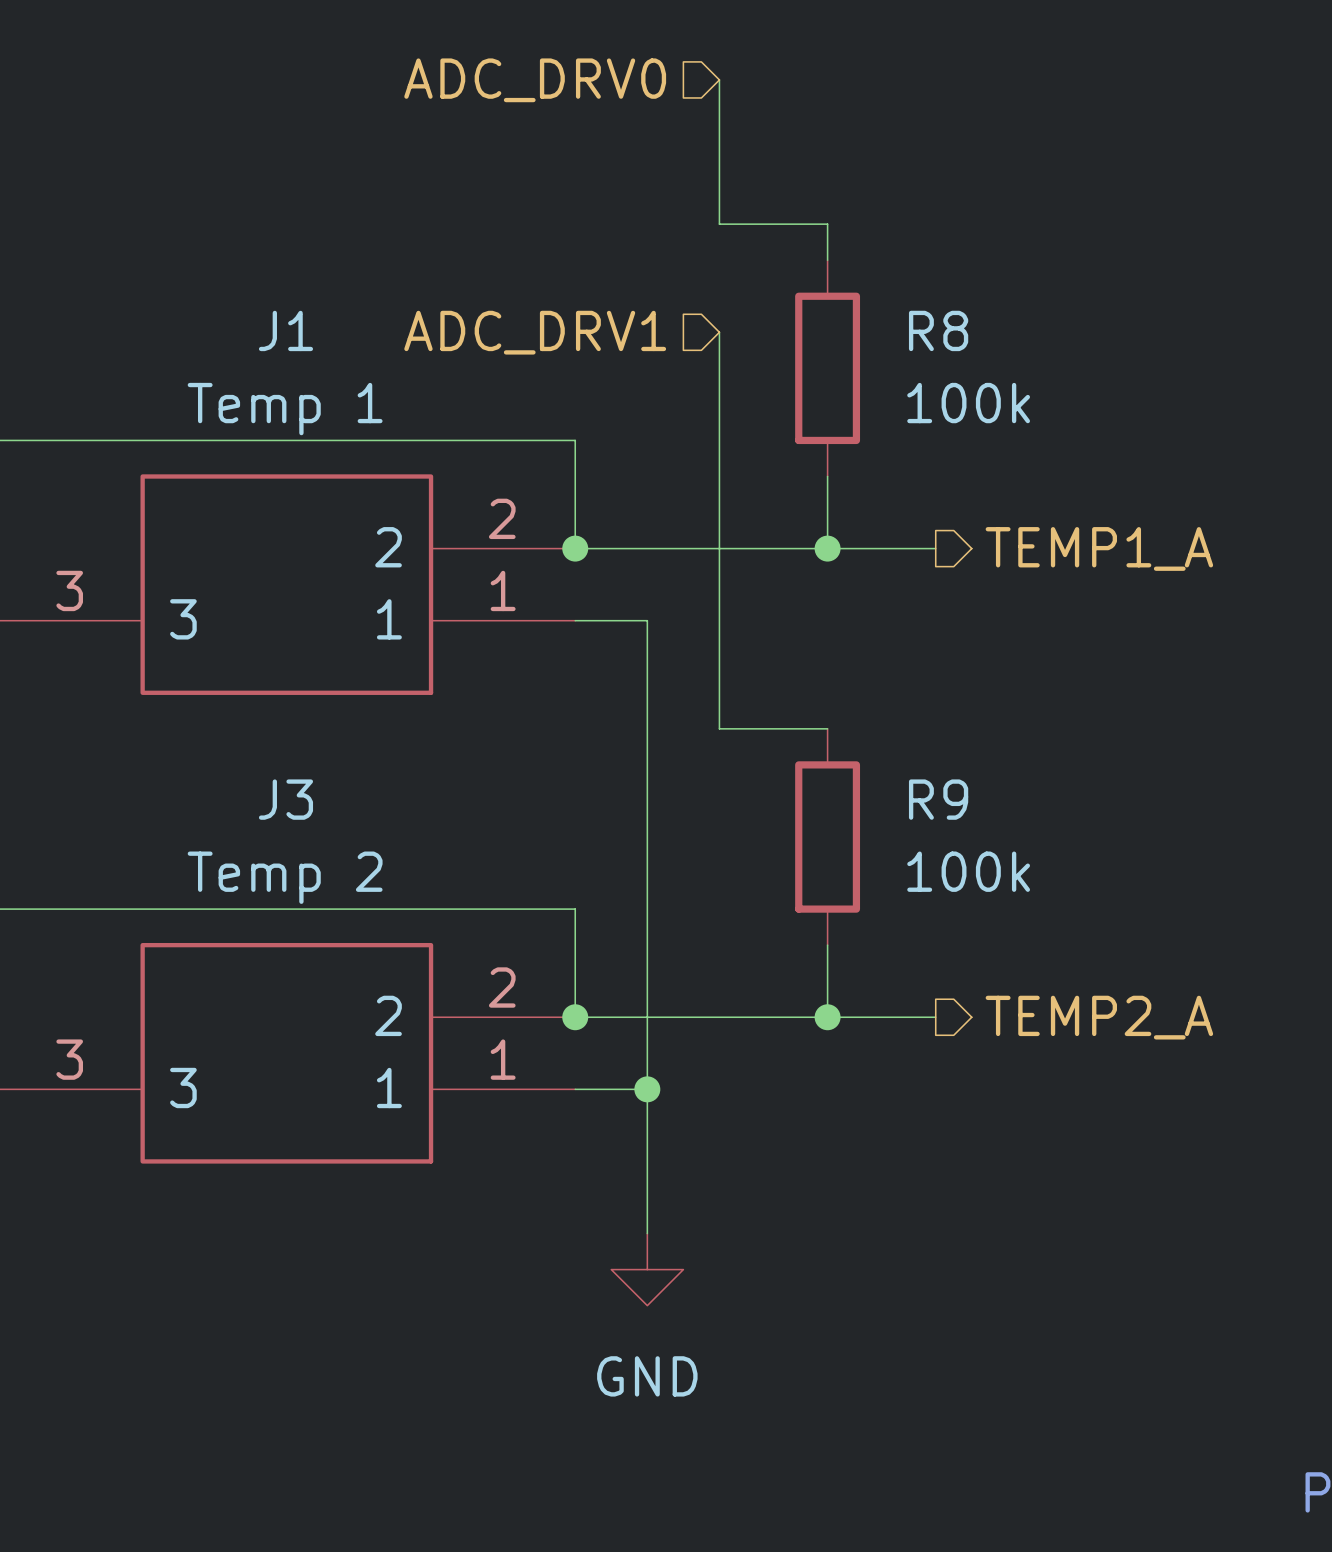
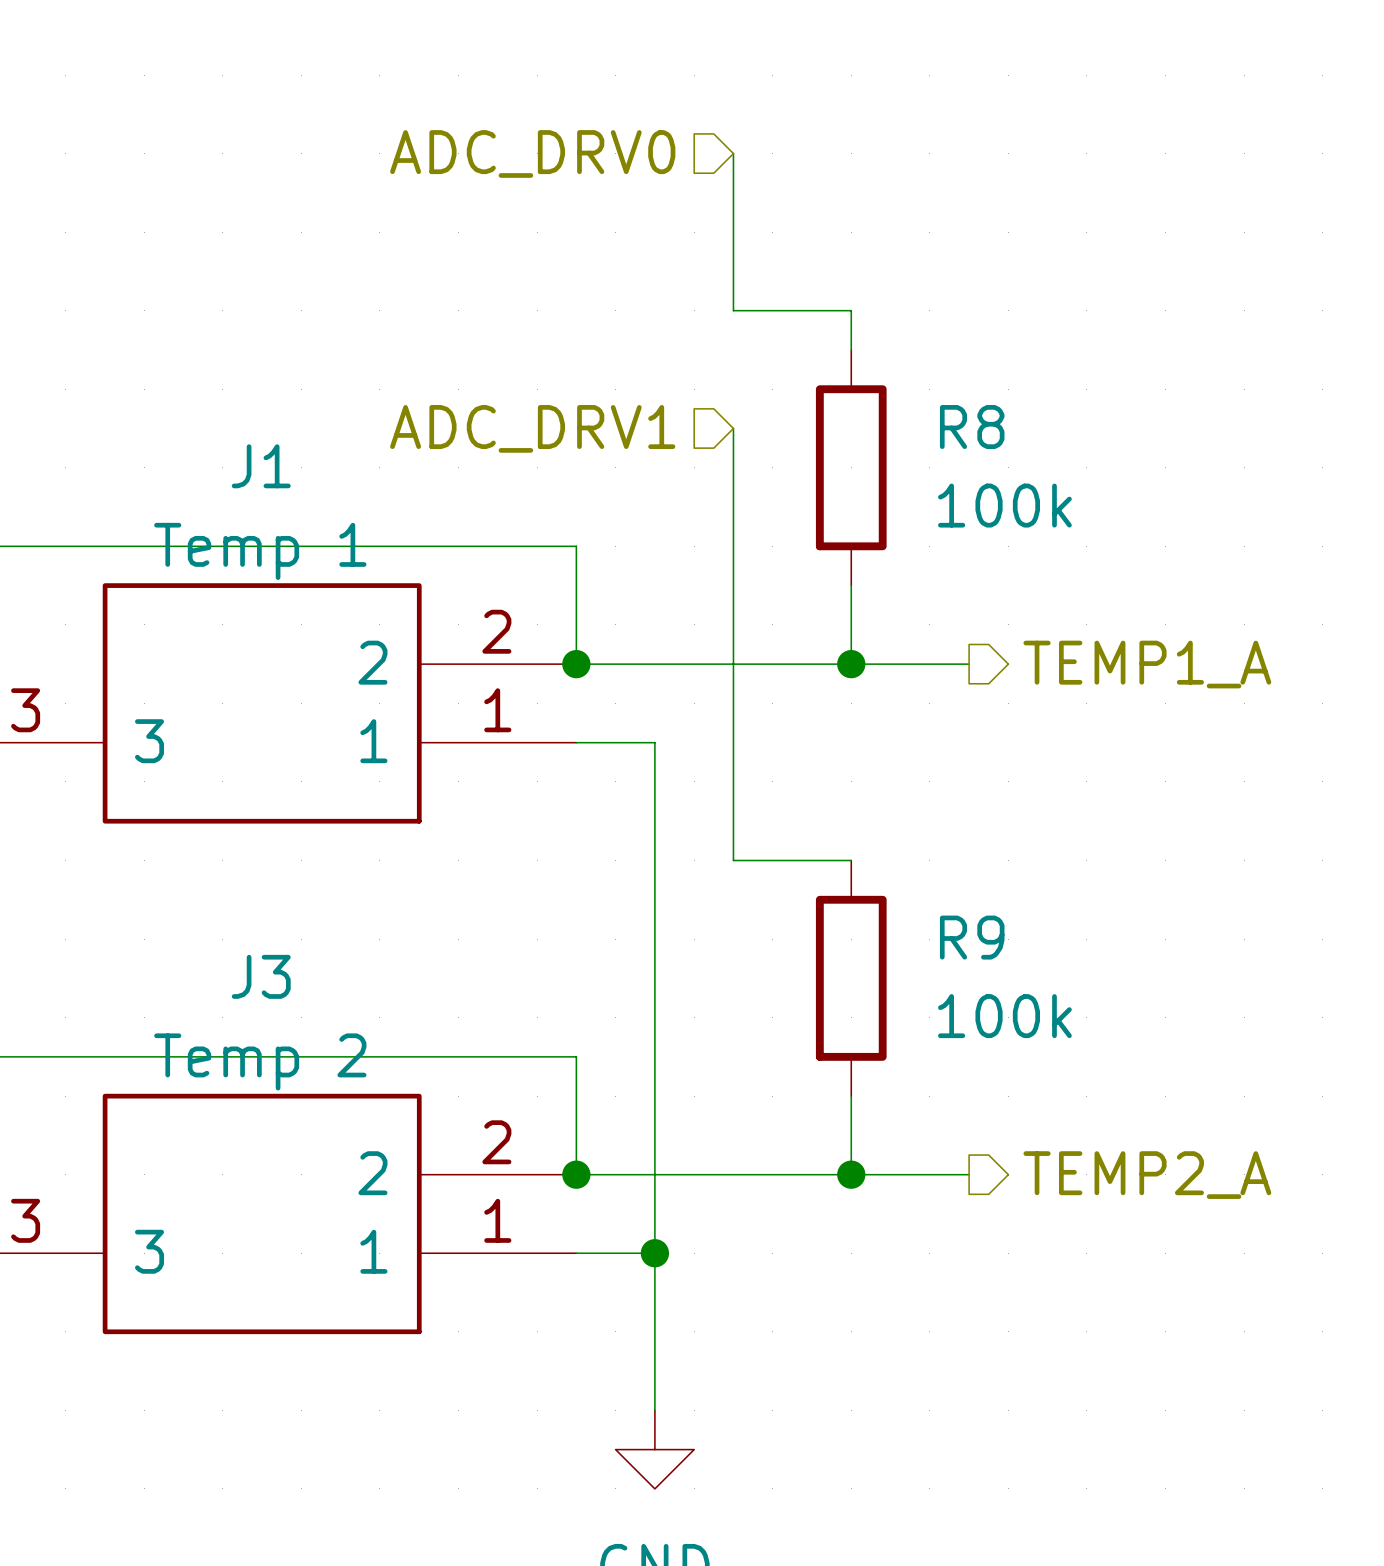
J1 name position: J1 (285, 330) -> J1 (261, 466)
J1 value position: Temp 1 (285, 409) -> Temp 1 (260, 551)
J3 name position: J3 (285, 799) -> J3 (261, 976)
J3 value position: Temp 2 (285, 877) -> Temp 2 (260, 1061)

